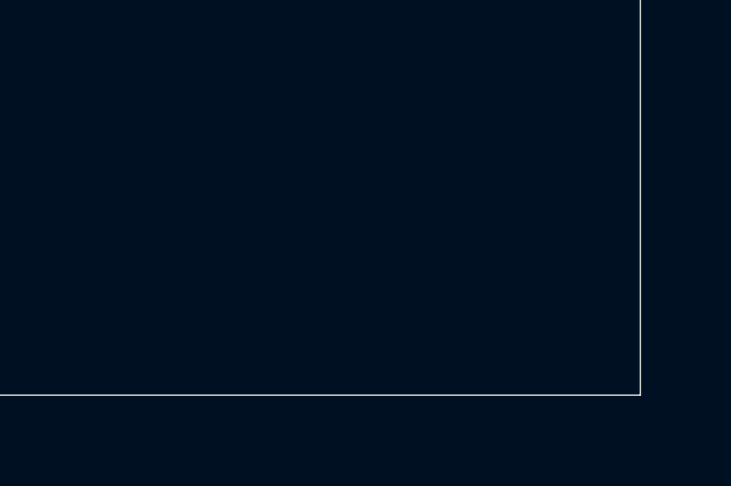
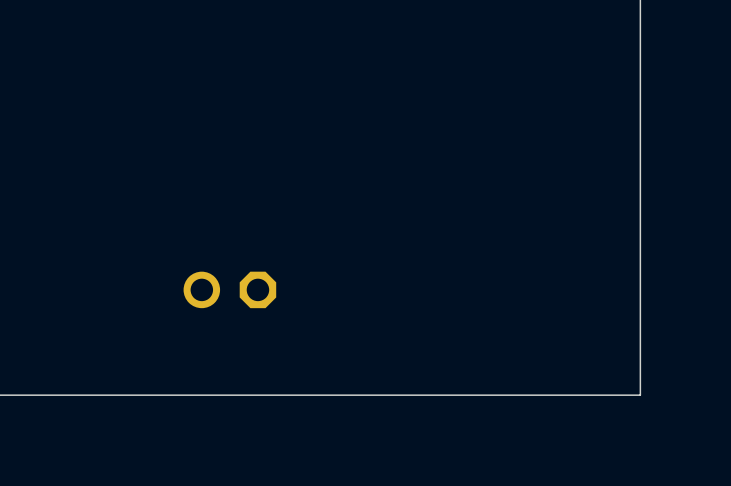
part: none -> (229, 289)

